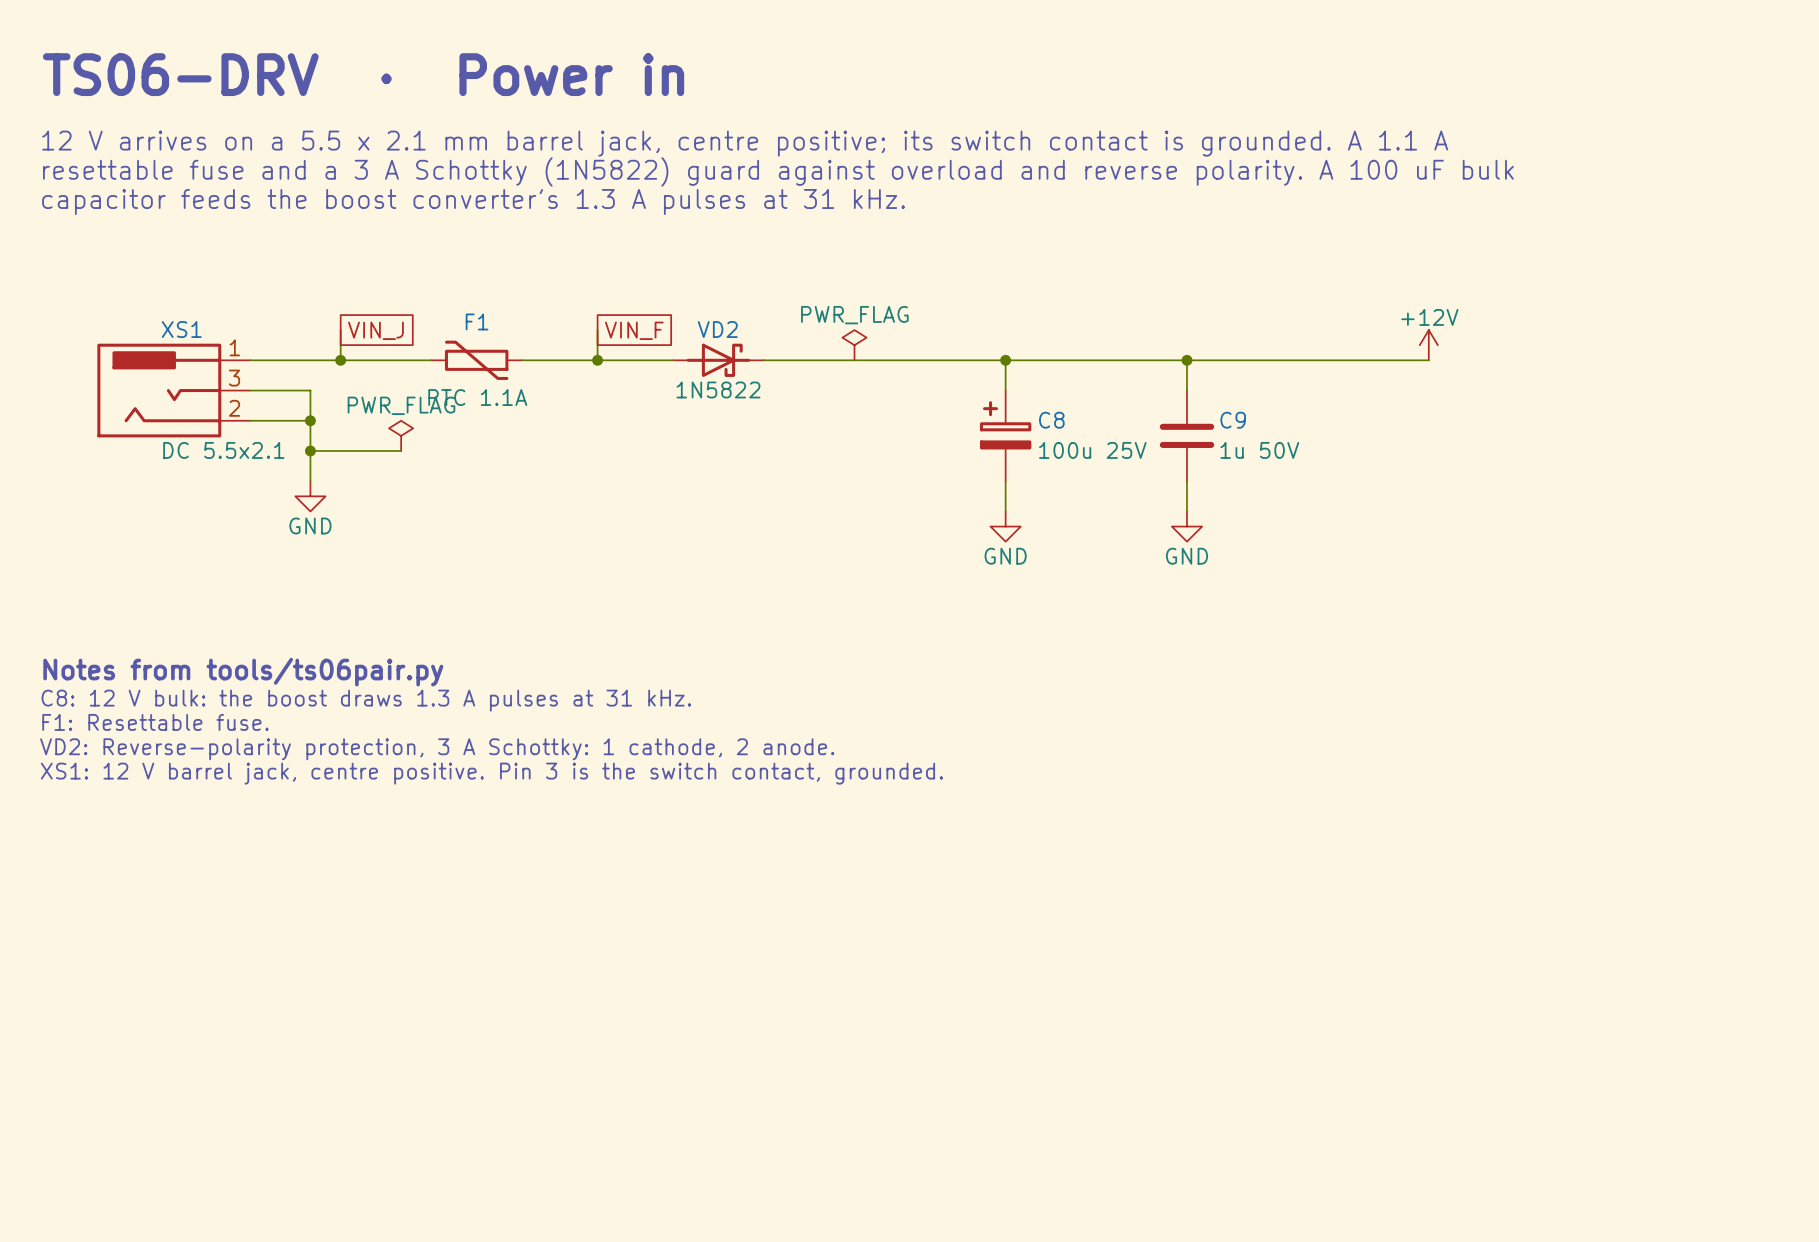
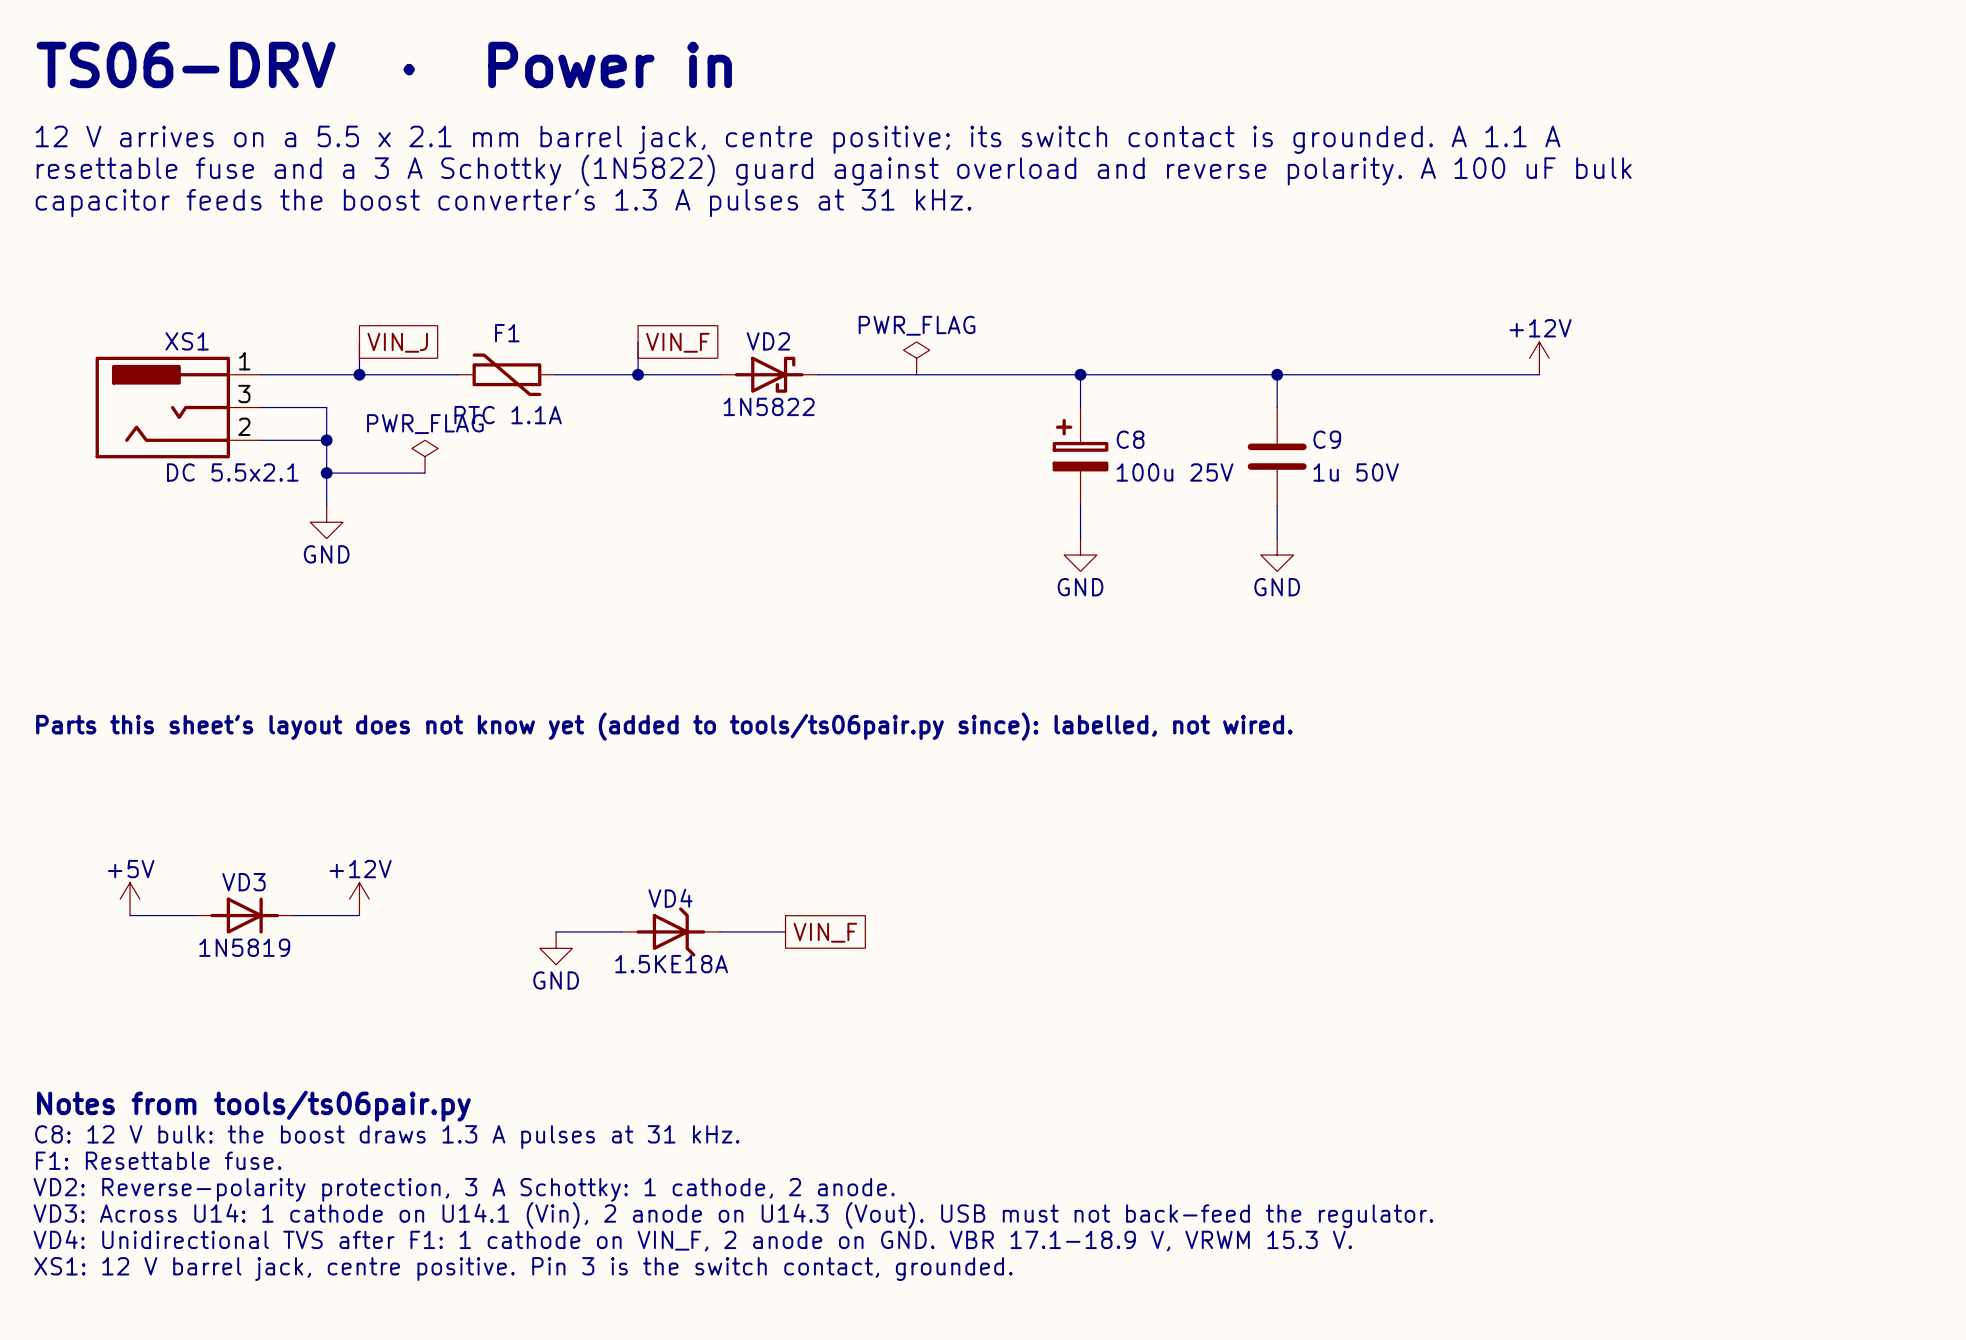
text: Notes from tools/ts06pair.py (243, 672) -> none
text: none -> Parts this sheet's layout does not know yet (added to tools/ts06pair.py since): labelled, not wired. (664, 726)
text: C8: 12 V bulk: the boost draws 1.3 A pulses at 31 kHz. (366, 700) -> none
text: F1: Resettable fuse. (155, 722) -> none
text: VD2: Reverse-polarity protection, 3 A Schottky: 1 cathode, 2 anode. (437, 749) -> none
text: XS1: 12 V barrel jack, centre positive. Pin 3 is the switch contact, grounded. (491, 773) -> none
power symbol: none -> +5V (130, 899)
power symbol: none -> +12V (359, 899)
wire: none -> (130, 915) (195, 915)
VD3: none -> 1N5819 (244, 915)
wire: none -> (293, 915) (359, 915)
wire: none -> (556, 931) (621, 931)
VD4: none -> 1.5KE18A (670, 931)
wire: none -> (719, 931) (785, 931)
global label: none -> VIN_F (825, 932)
power symbol: none -> GND (556, 948)
text: none -> Notes from tools/ts06pair.py (253, 1106)
text: none -> C8: 12 V bulk: the boost draws 1.3 A pulses at 31 kHz. (387, 1137)
text: none -> F1: Resettable fuse. (158, 1160)
text: none -> VD2: Reverse-polarity protection, 3 A Schottky: 1 cathode, 2 anode. (464, 1189)
text: none -> VD3: Across U14: 1 cathode on U14.1 (Vin), 2 anode on U14.3 (Vout). USB must not back-feed the regulator. (733, 1215)
text: none -> VD4: Unidirectional TVS after F1: 1 cathode on VIN_F, 2 anode on GND. VBR 17.1-18.9 V, VRWM 15.3 V. (692, 1240)
text: none -> XS1: 12 V barrel jack, centre positive. Pin 3 is the switch contact, grounded. (523, 1269)

